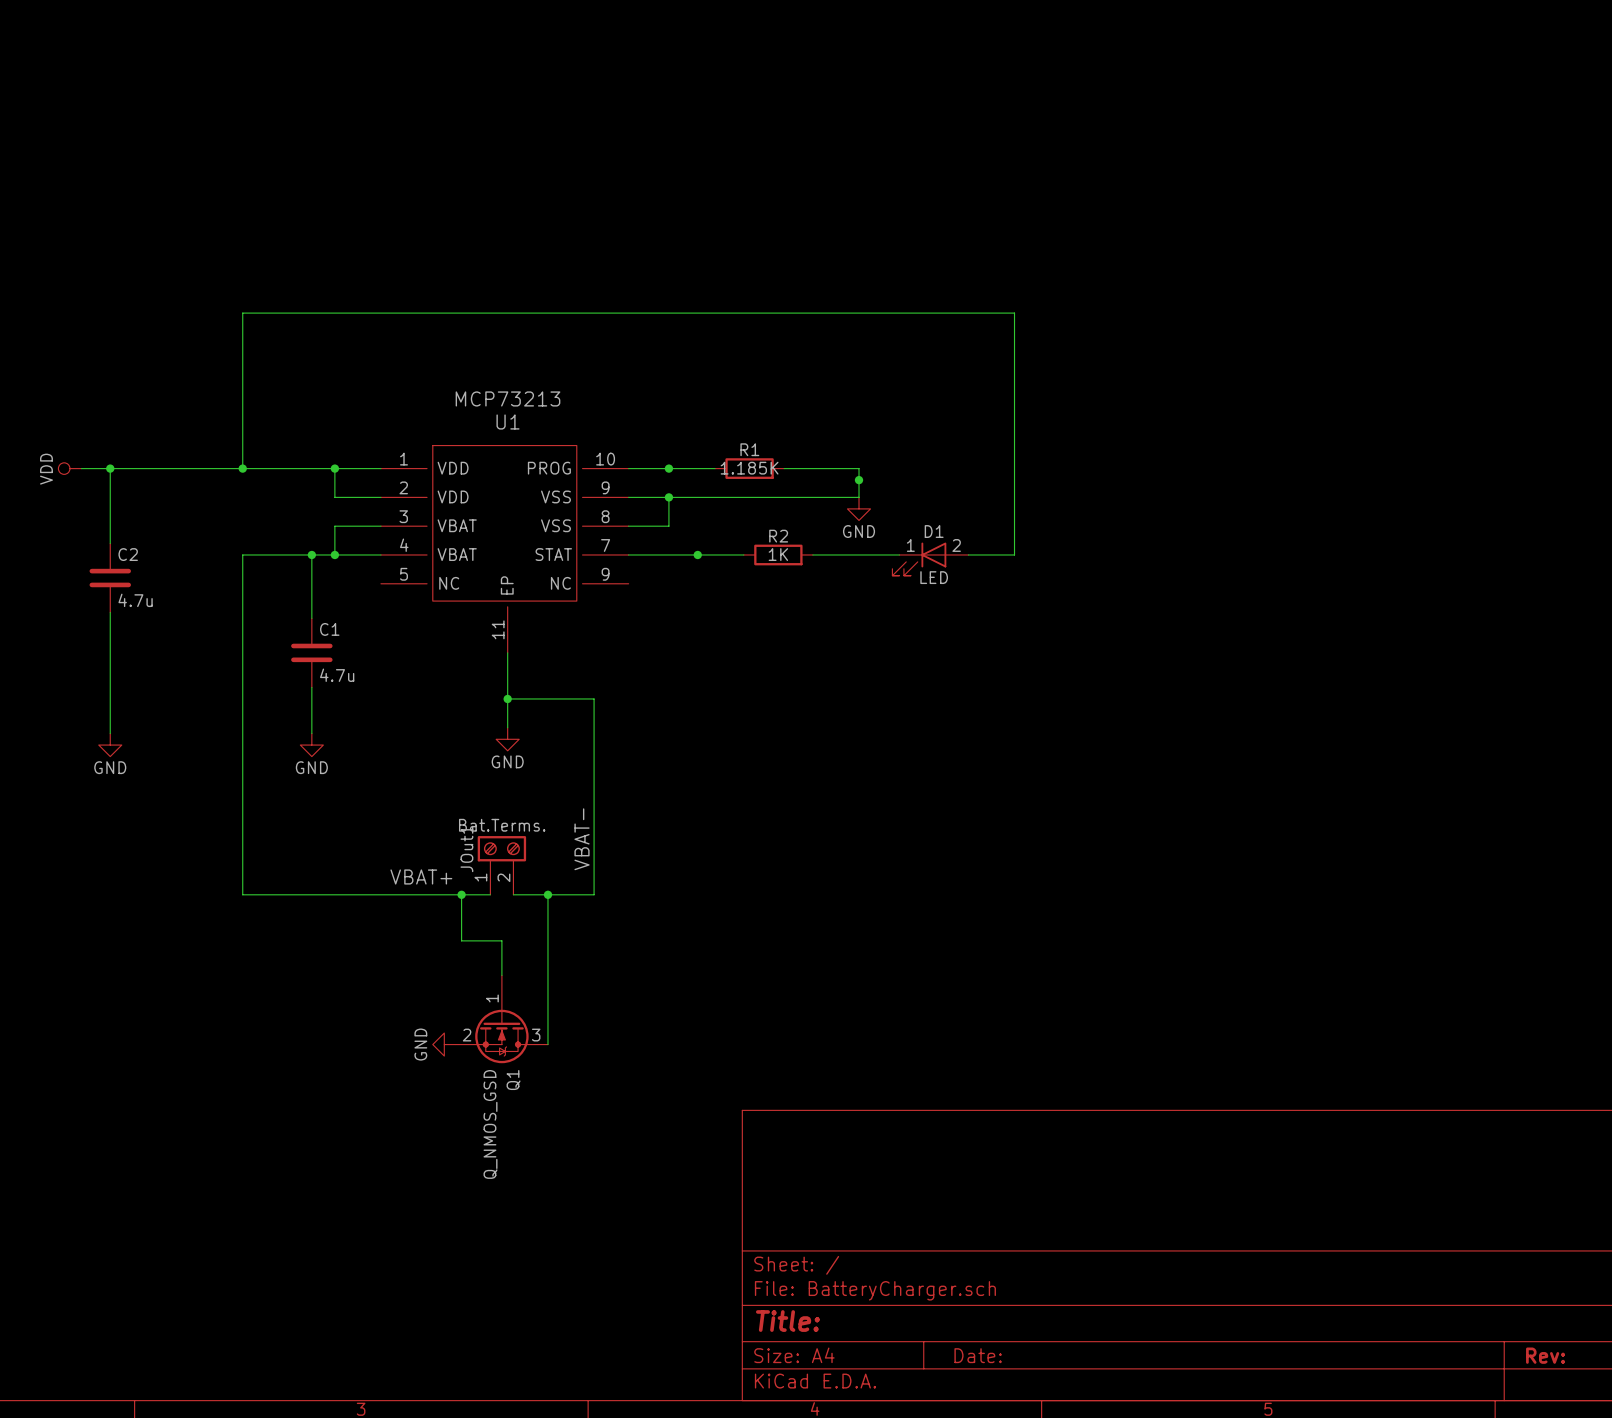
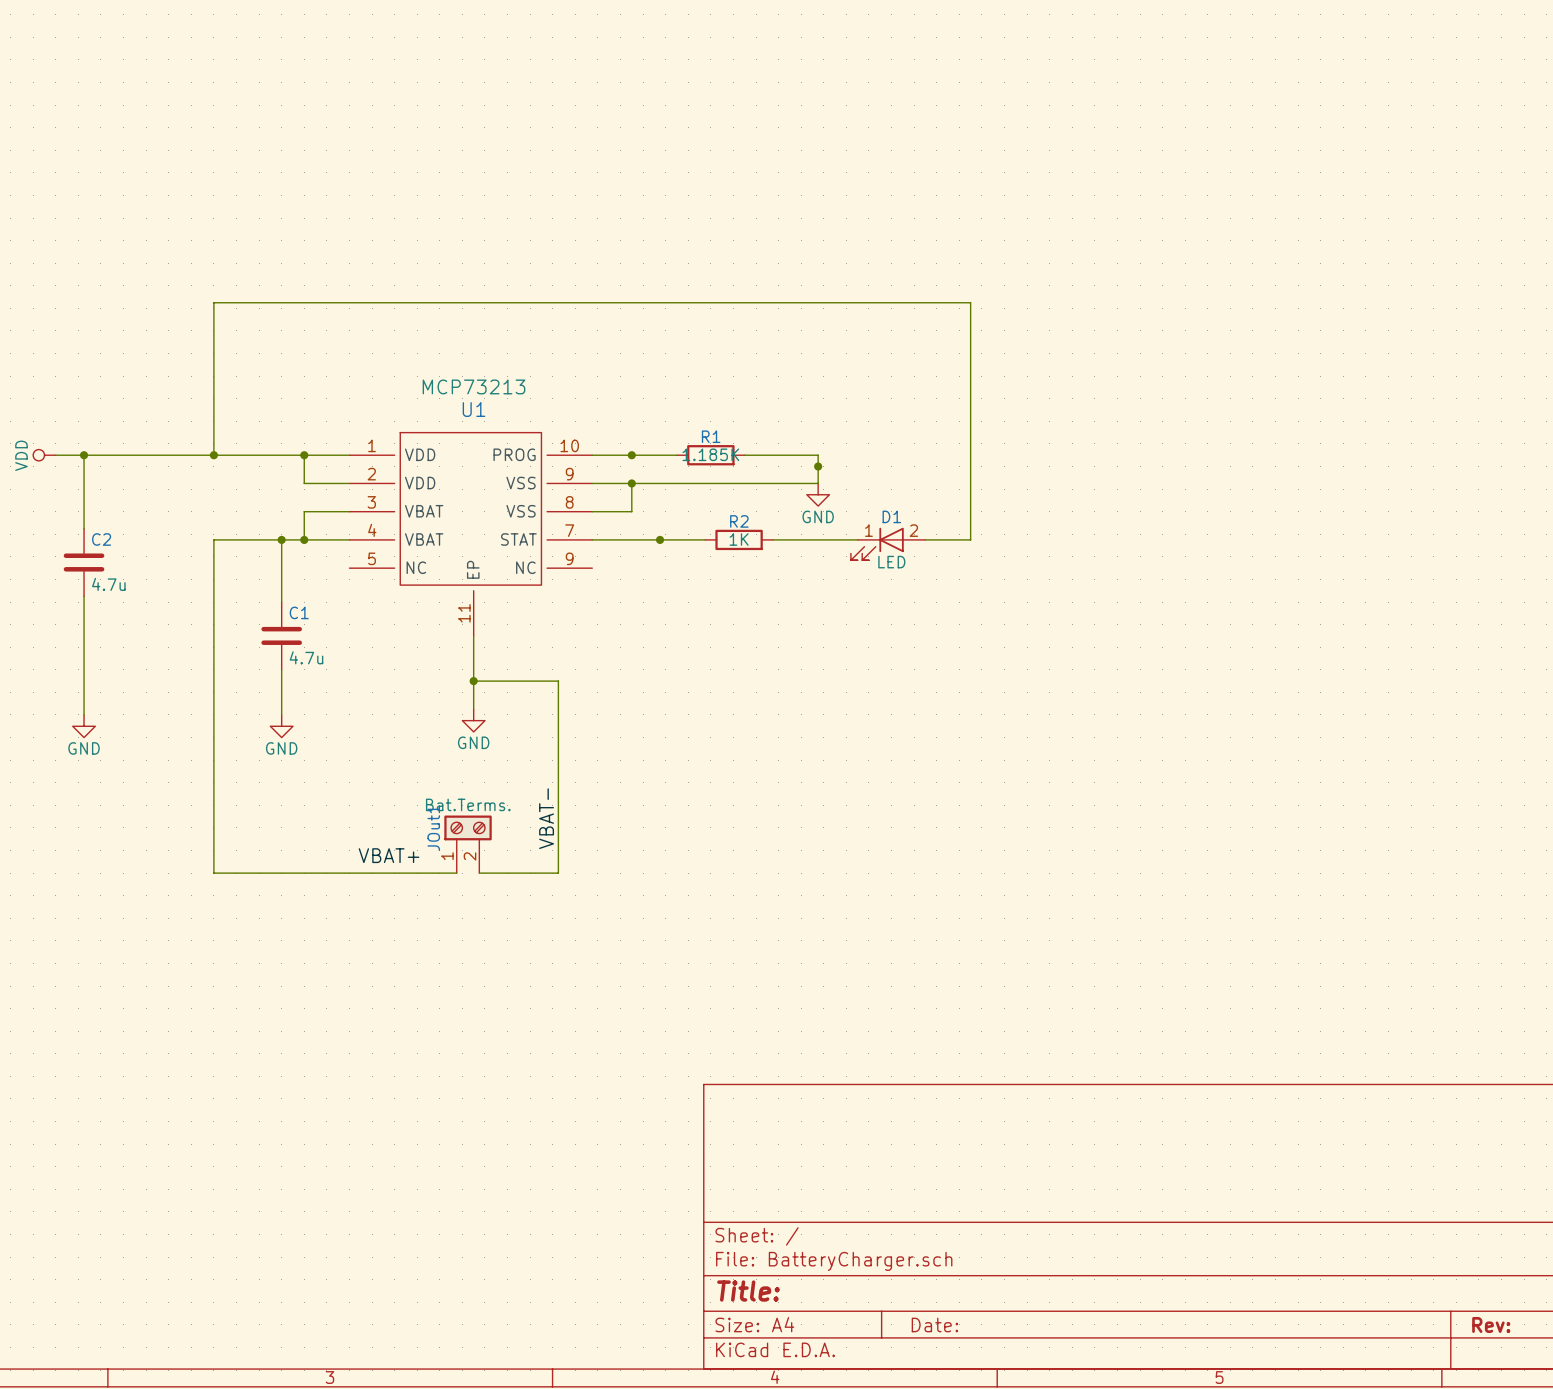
wire: (461, 894) (461, 940) (501, 940) (501, 975) -> none
junction: (461, 894) -> none
wire: (547, 894) (547, 1044) -> none
junction: (547, 894) -> none
Q1: Q_NMOS_GSD (501, 1019) -> none
power symbol: GND (444, 1044) -> none

